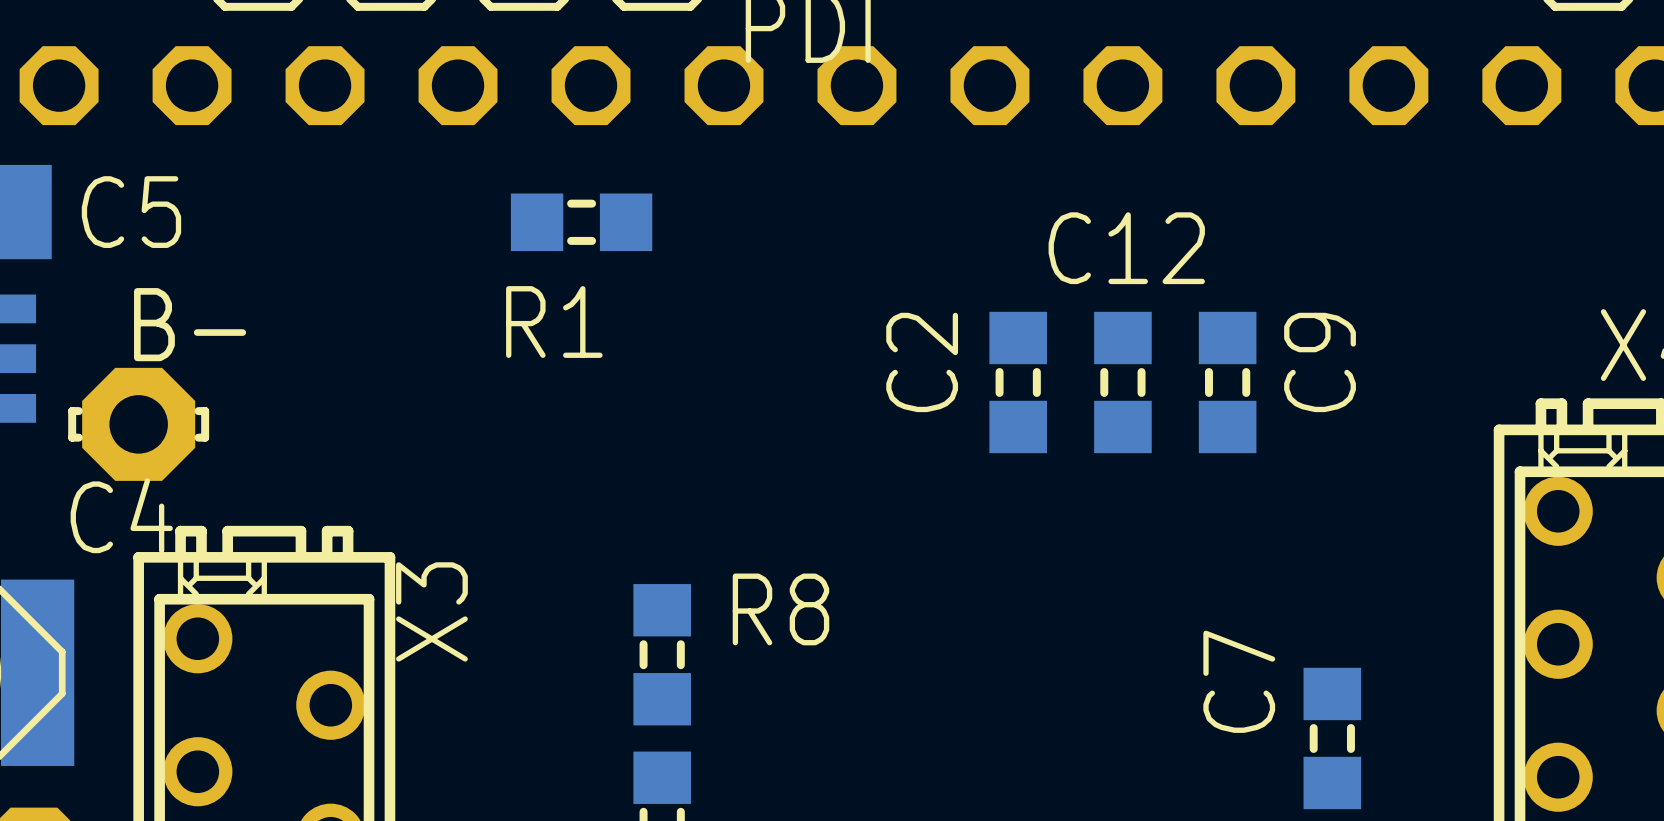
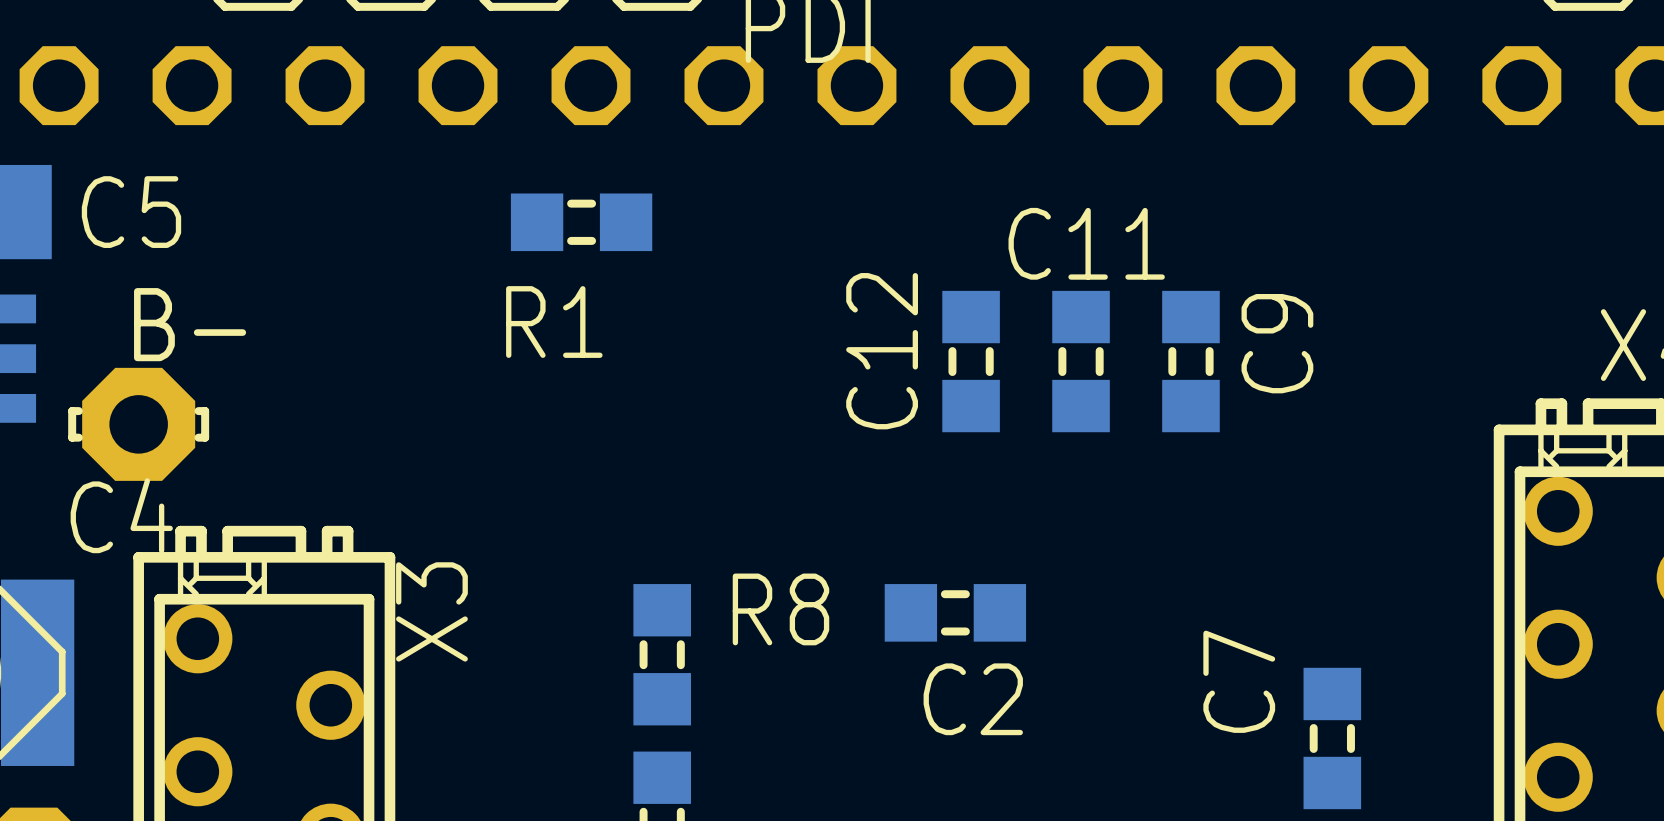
C12 name rotation: 0° (1126, 248) -> 90° counterclockwise (882, 351)
C11: none -> (1081, 361)
C2 name position: C2 (922, 362) -> C2 (973, 699)
C9 name position: C9 (1320, 362) -> C9 (1277, 343)
C2 rotation: 0° (1018, 382) -> 90° clockwise (955, 612)
C2 position: (1018, 382) -> (955, 612)
C12 position: (1122, 382) -> (971, 361)
C9 position: (1227, 382) -> (1190, 361)

